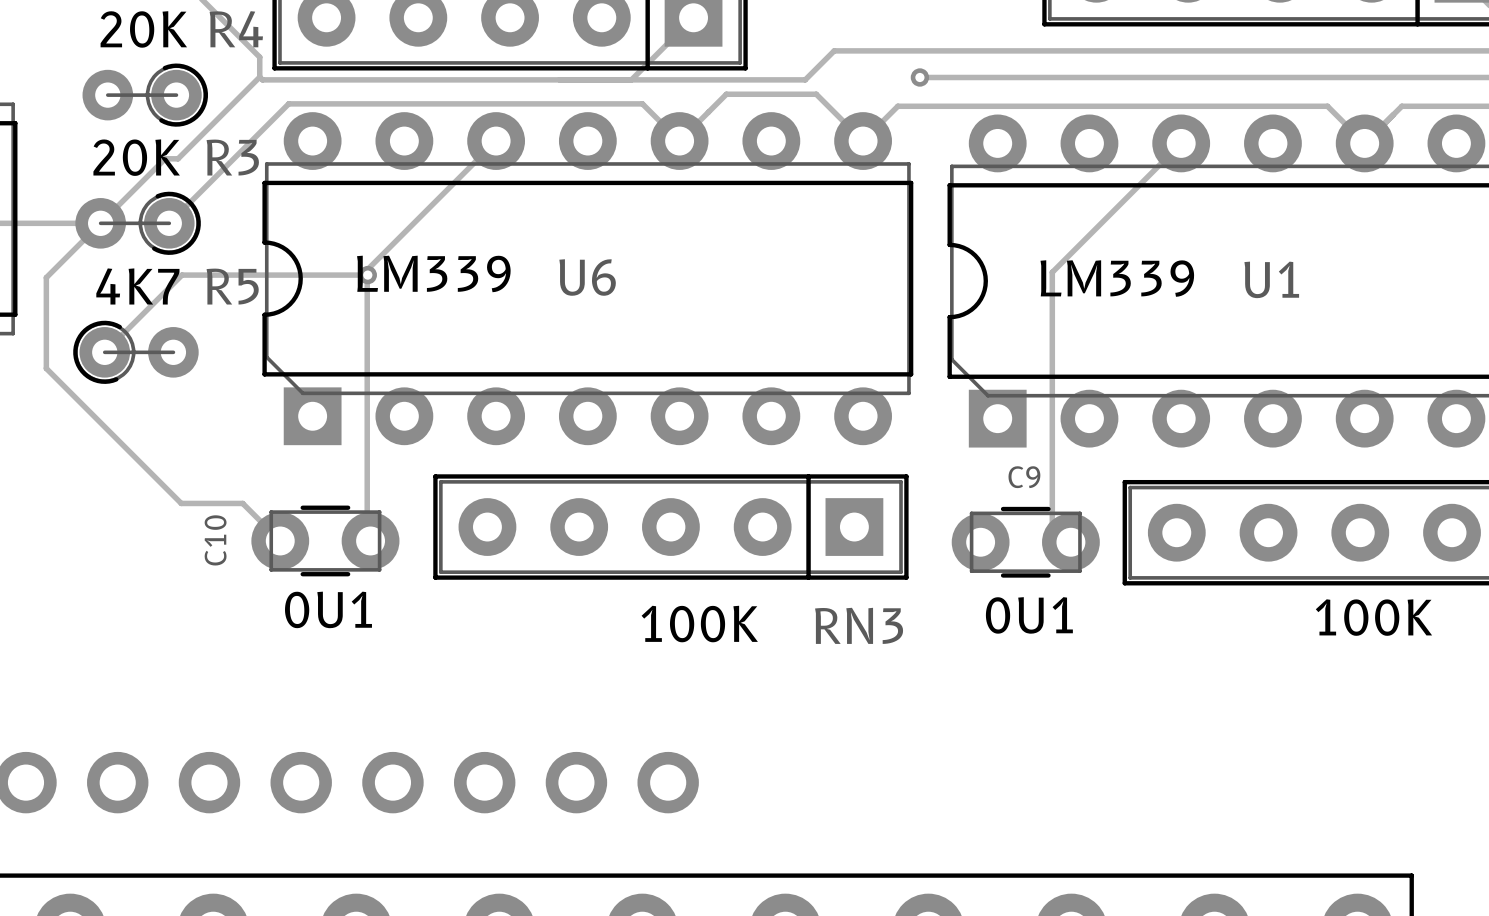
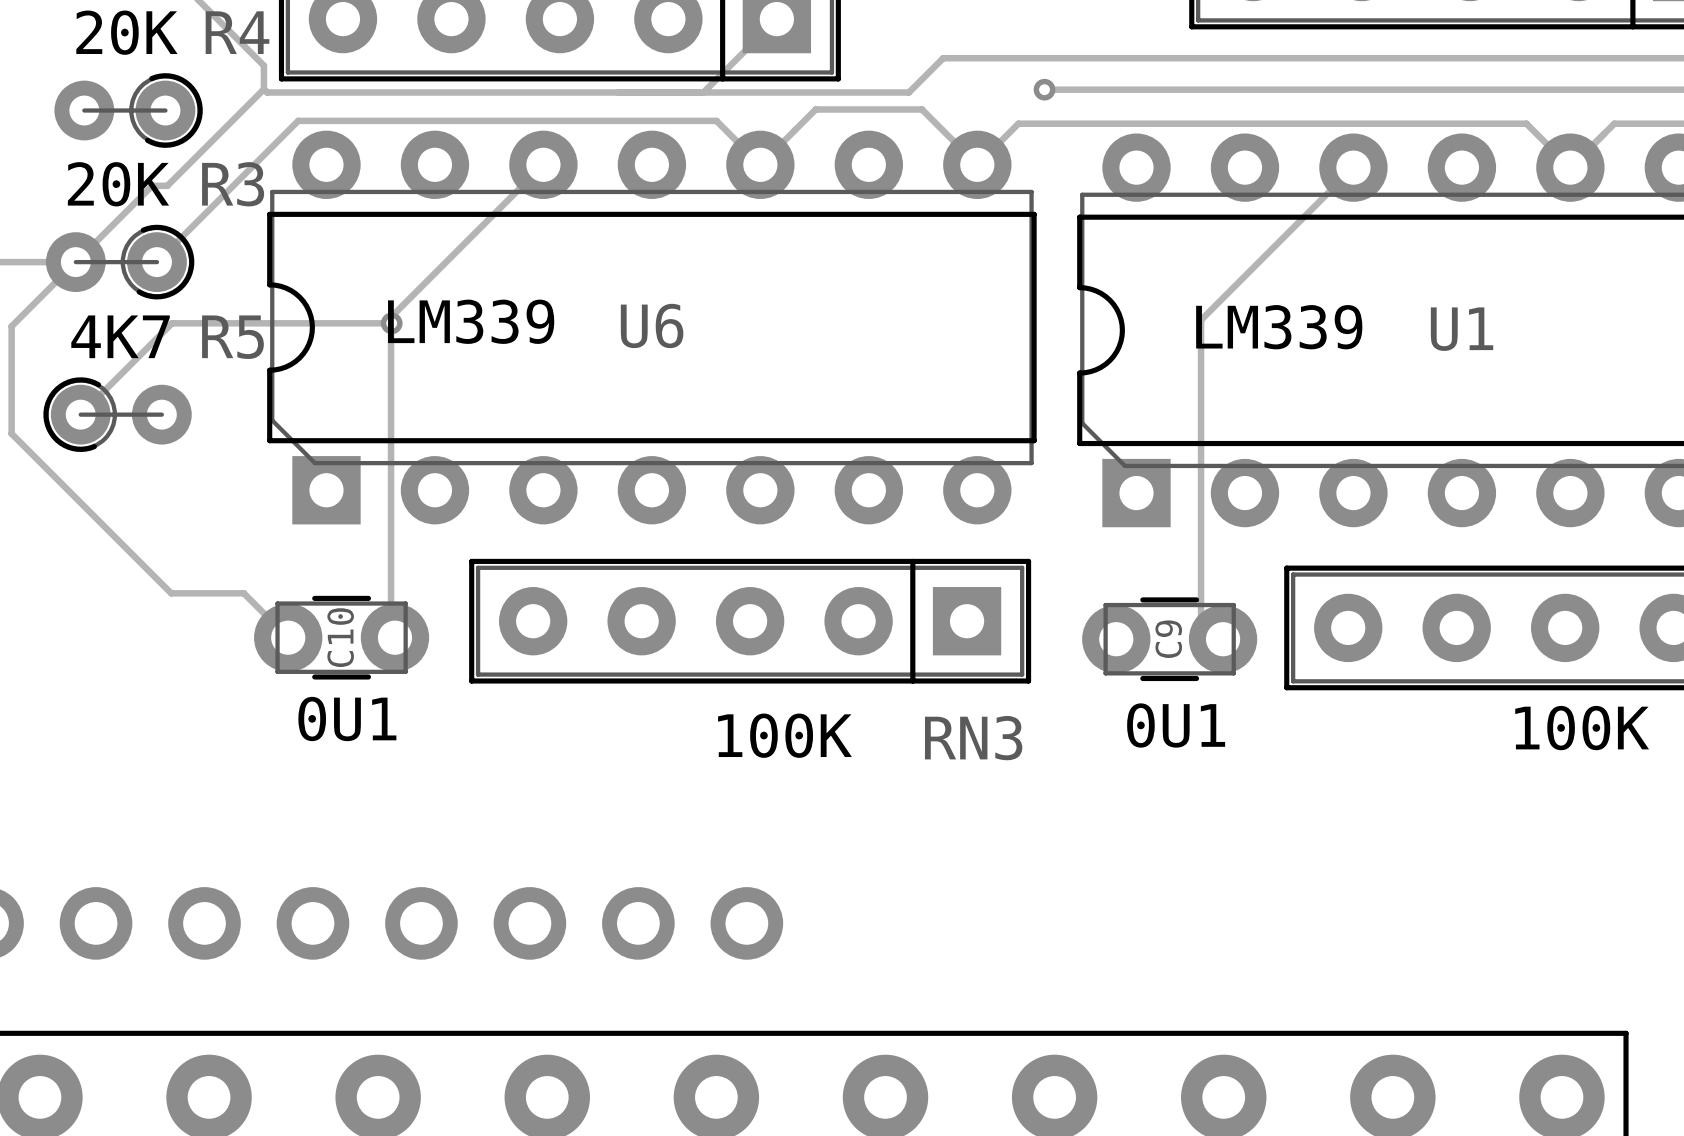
C9 name rotation: 0° (1024, 477) -> 90° counterclockwise (1168, 639)
C9 name position: C9 (1024, 477) -> C9 (1168, 639)
C10 name position: C10 (215, 540) -> C10 (340, 637)

